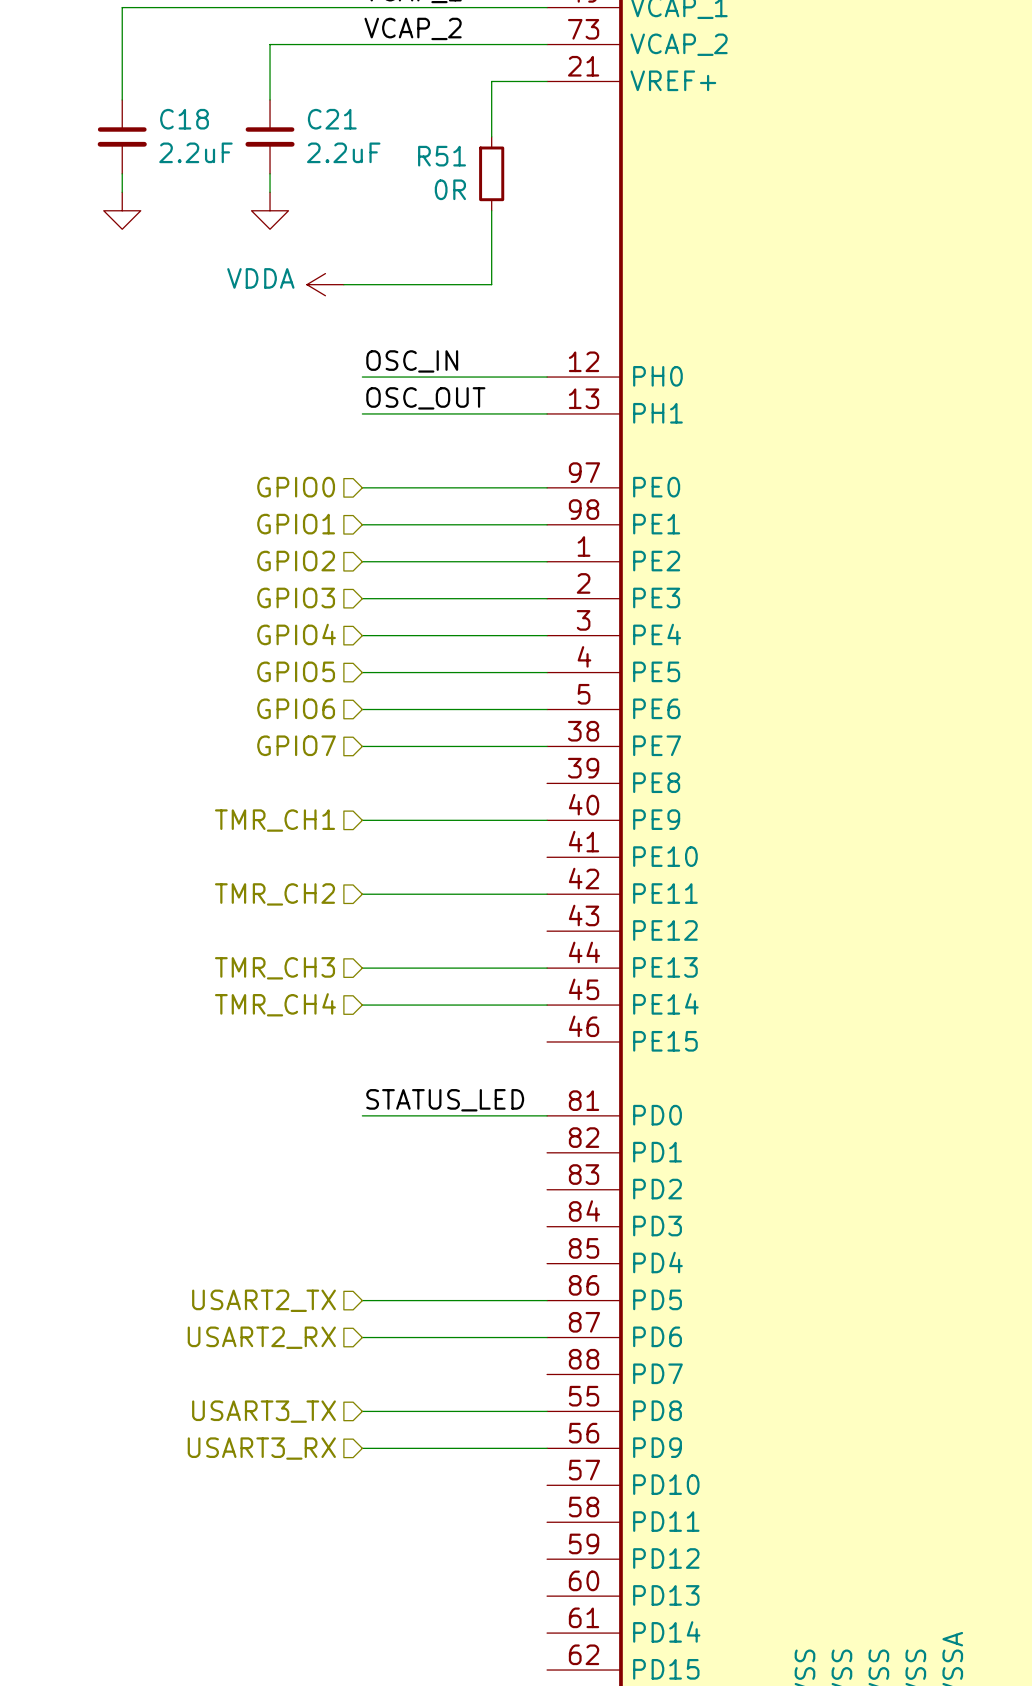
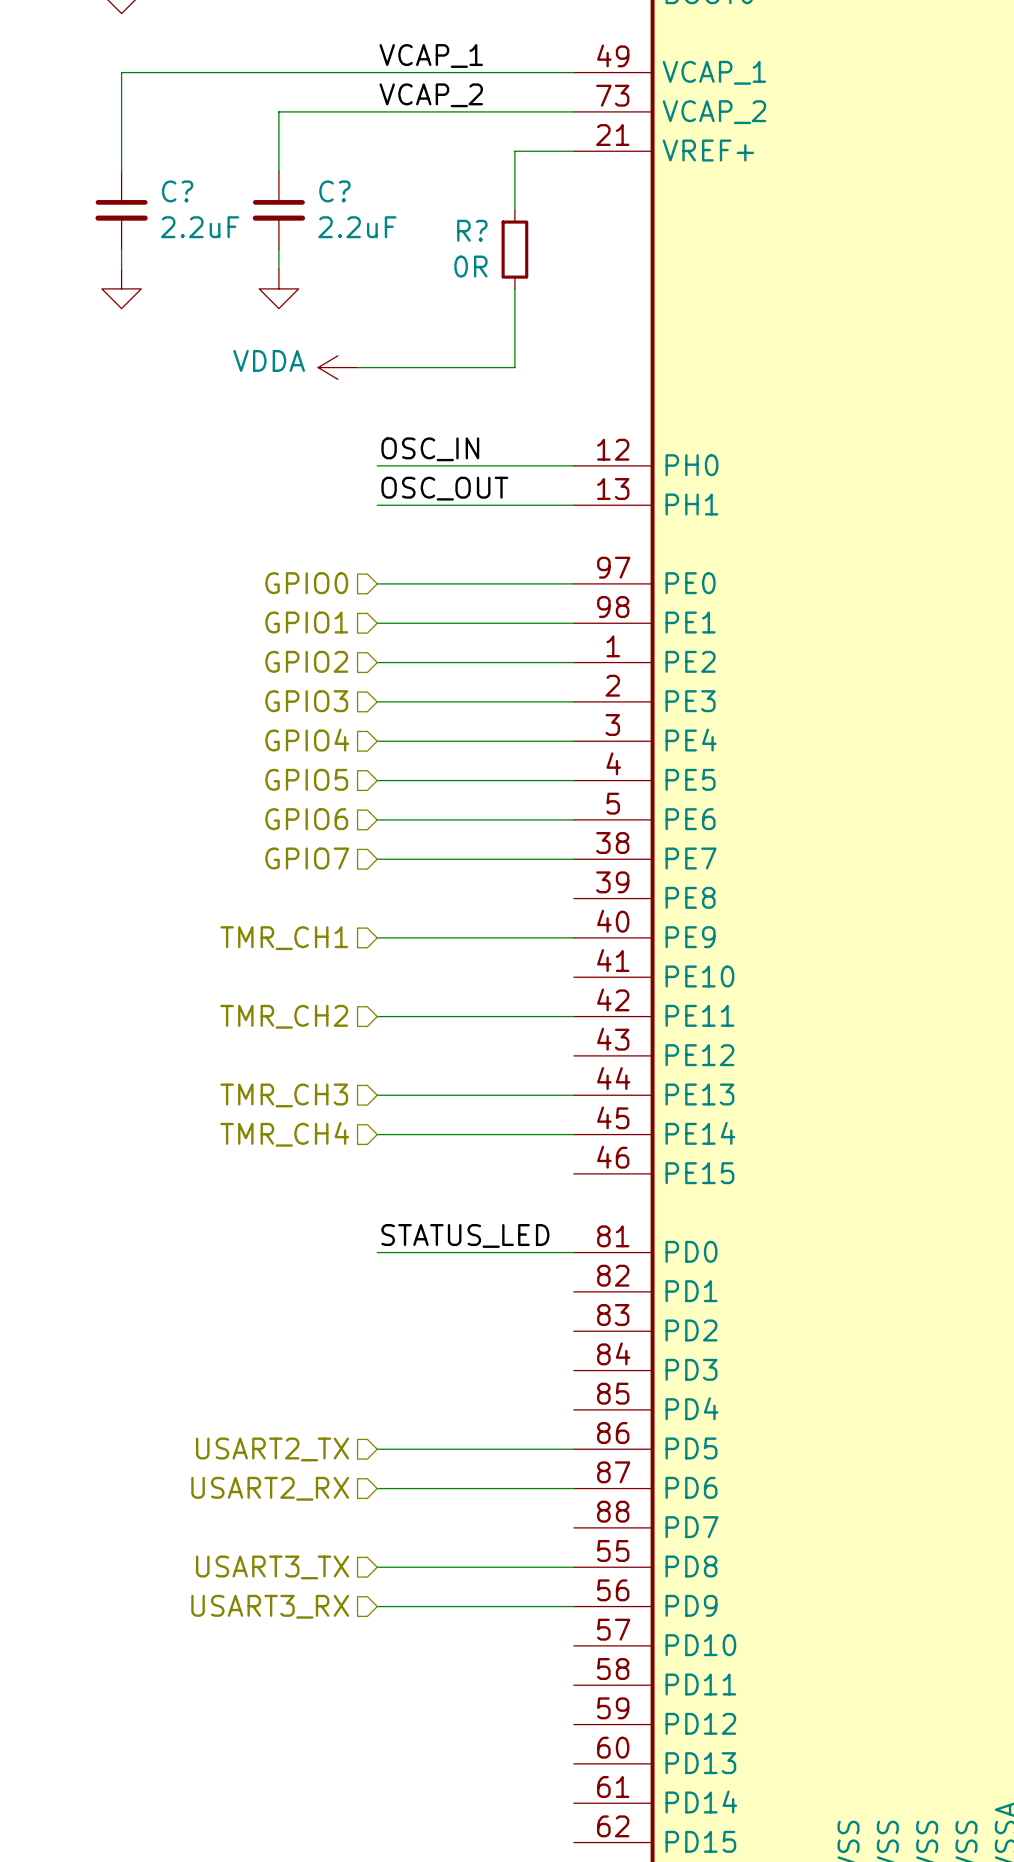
C18 name: C18 (184, 119) -> C? (177, 191)
C21 name: C21 (332, 119) -> C? (334, 191)
R51 name: R51 (442, 156) -> R? (472, 230)

